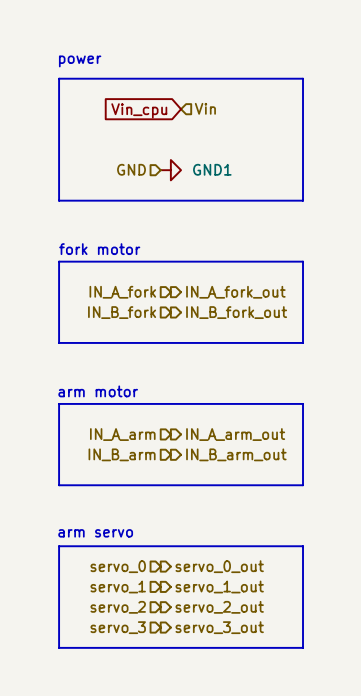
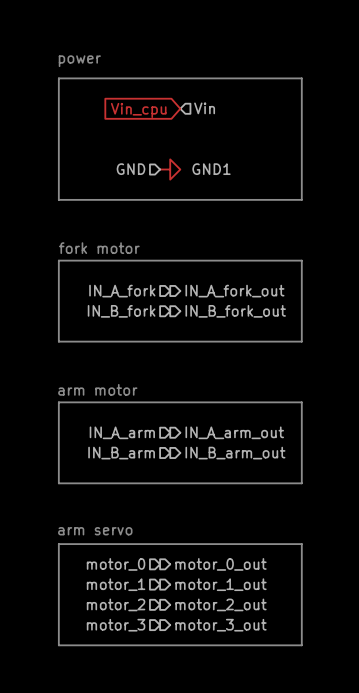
hierarchical label: servo_0 (118, 566) -> motor_0 (116, 564)
hierarchical label: servo_0_out (219, 566) -> motor_0_out (220, 564)
hierarchical label: servo_1 (118, 587) -> motor_1 (116, 584)
hierarchical label: servo_1_out (219, 587) -> motor_1_out (220, 584)
hierarchical label: servo_2 (118, 607) -> motor_2 (116, 604)
hierarchical label: servo_2_out (219, 607) -> motor_2_out (220, 604)
hierarchical label: servo_3 (118, 627) -> motor_3 (116, 625)
hierarchical label: servo_3_out (219, 627) -> motor_3_out (220, 625)

